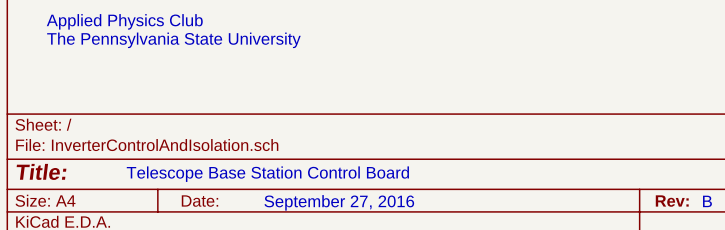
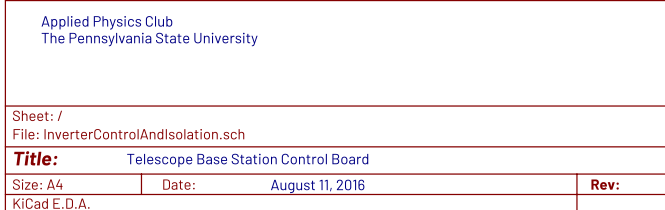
text: B (707, 201) -> none
text: September 27, 2016 (339, 202) -> none
text: none -> August 11, 2016 (317, 186)

